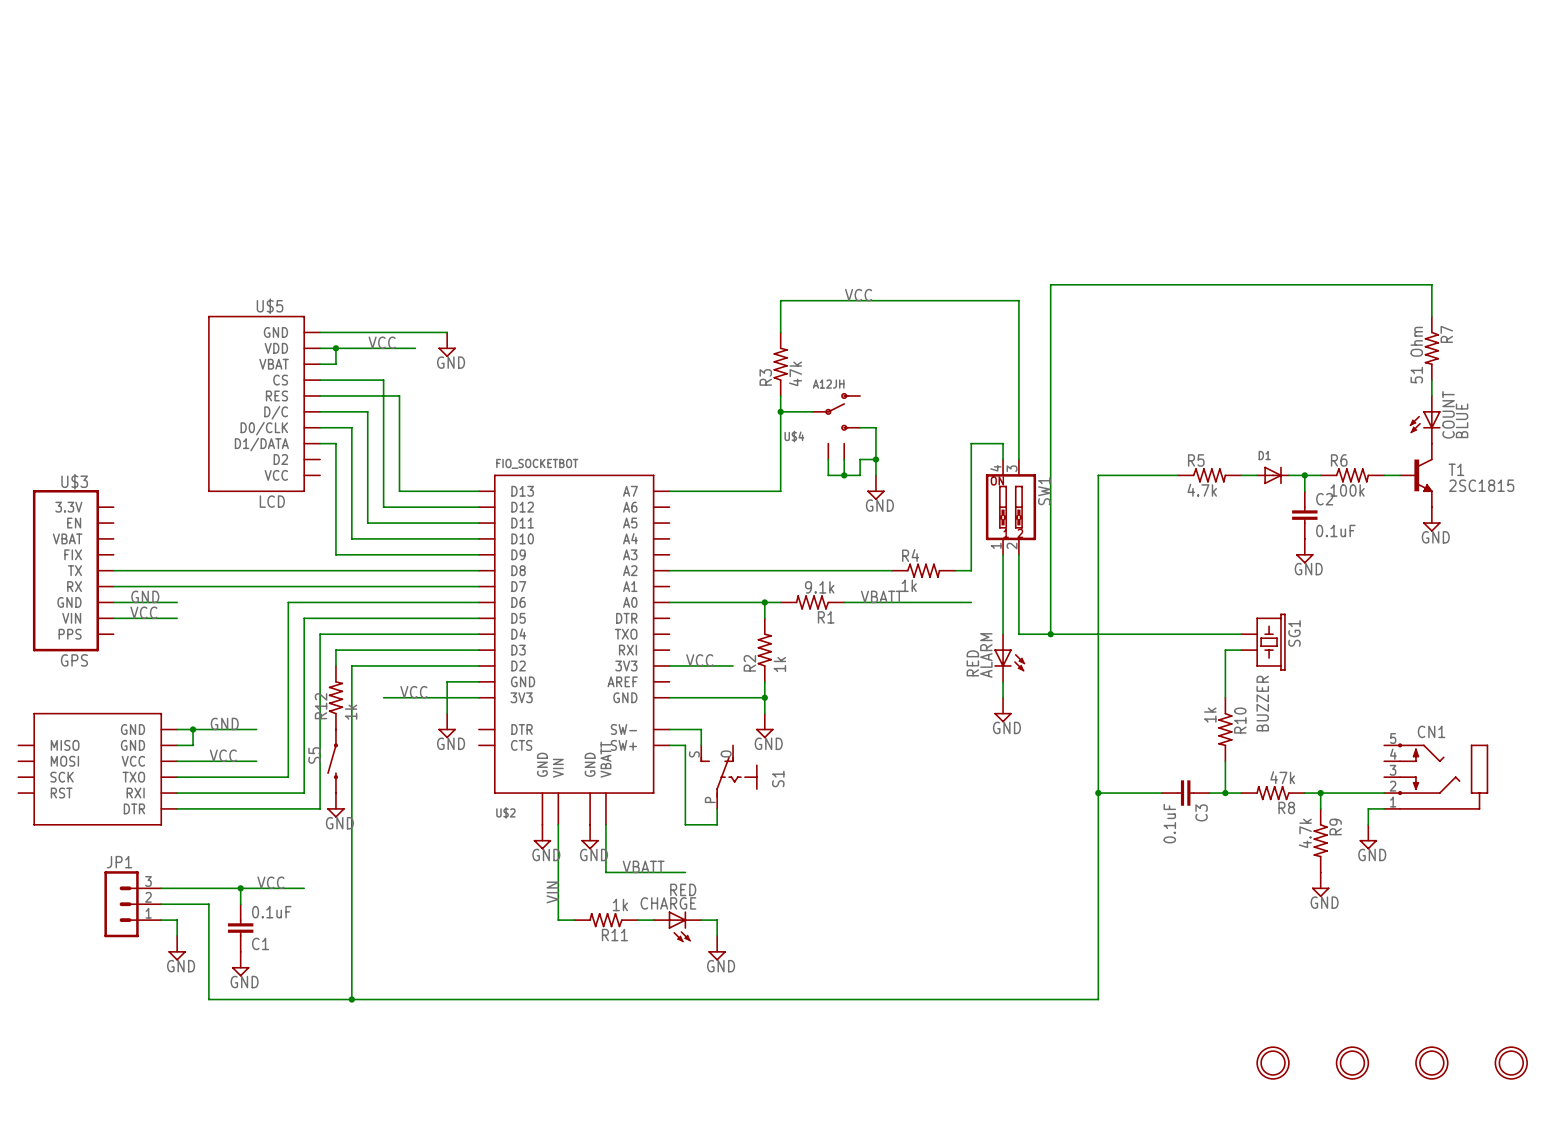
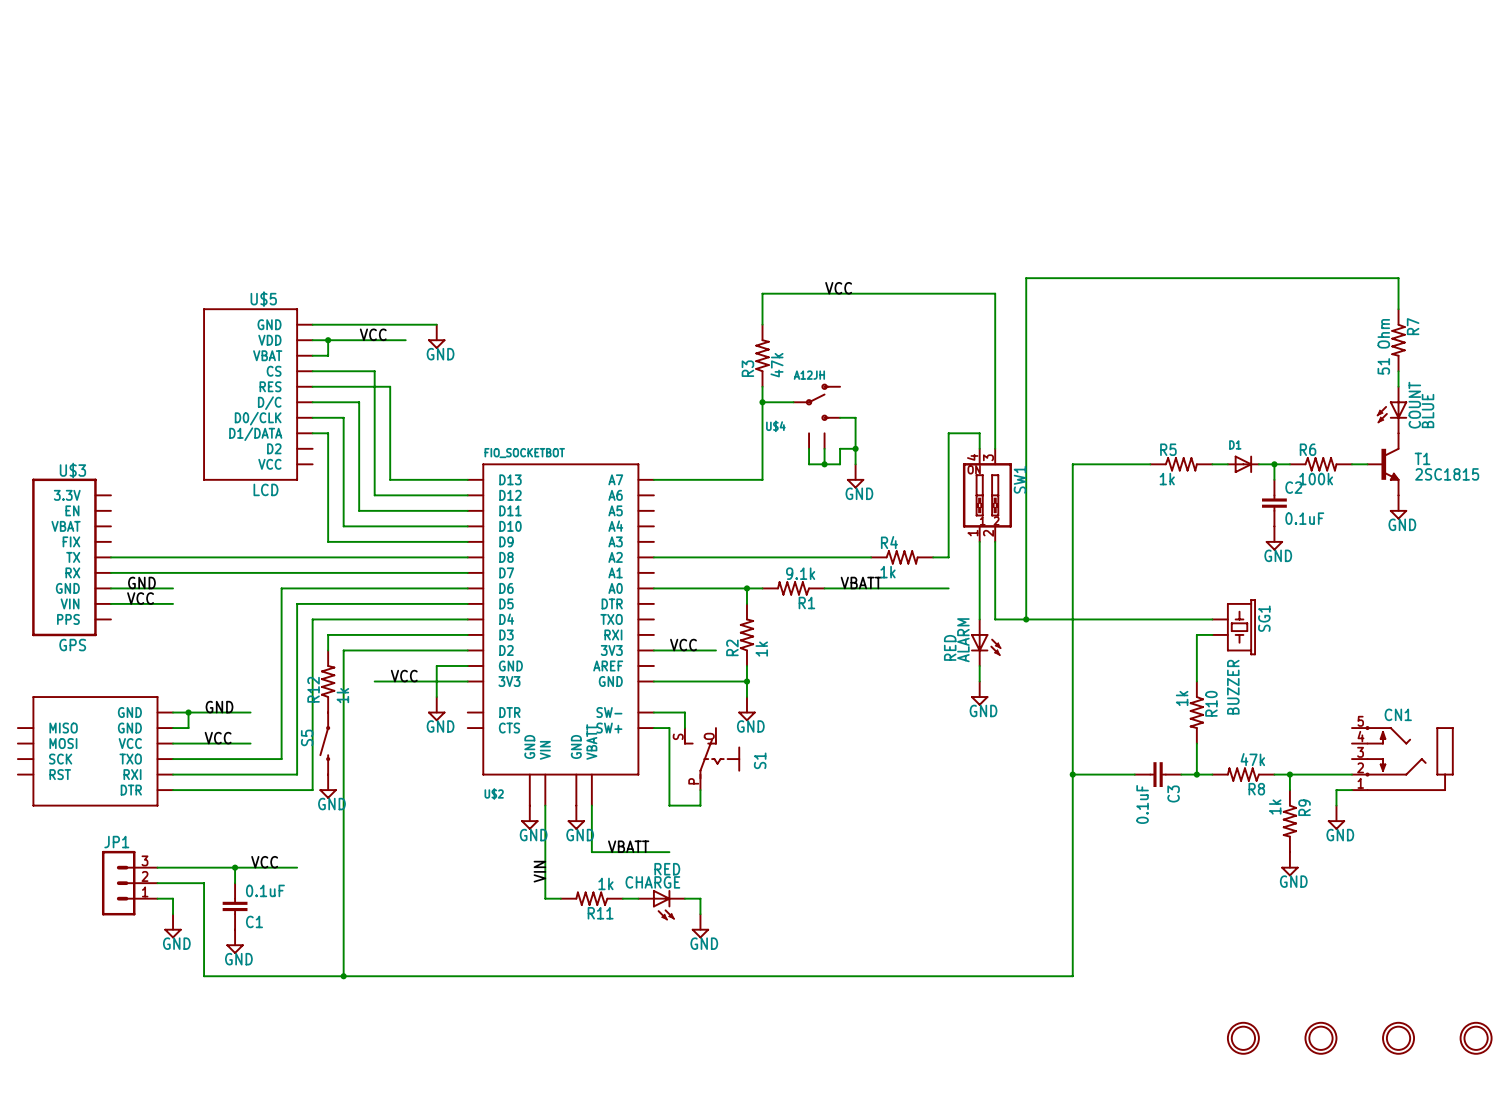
R5 value: 4.7k (1202, 490) -> 1k (1167, 479)
R9 value: 4.7k (1305, 833) -> 1k (1275, 807)

